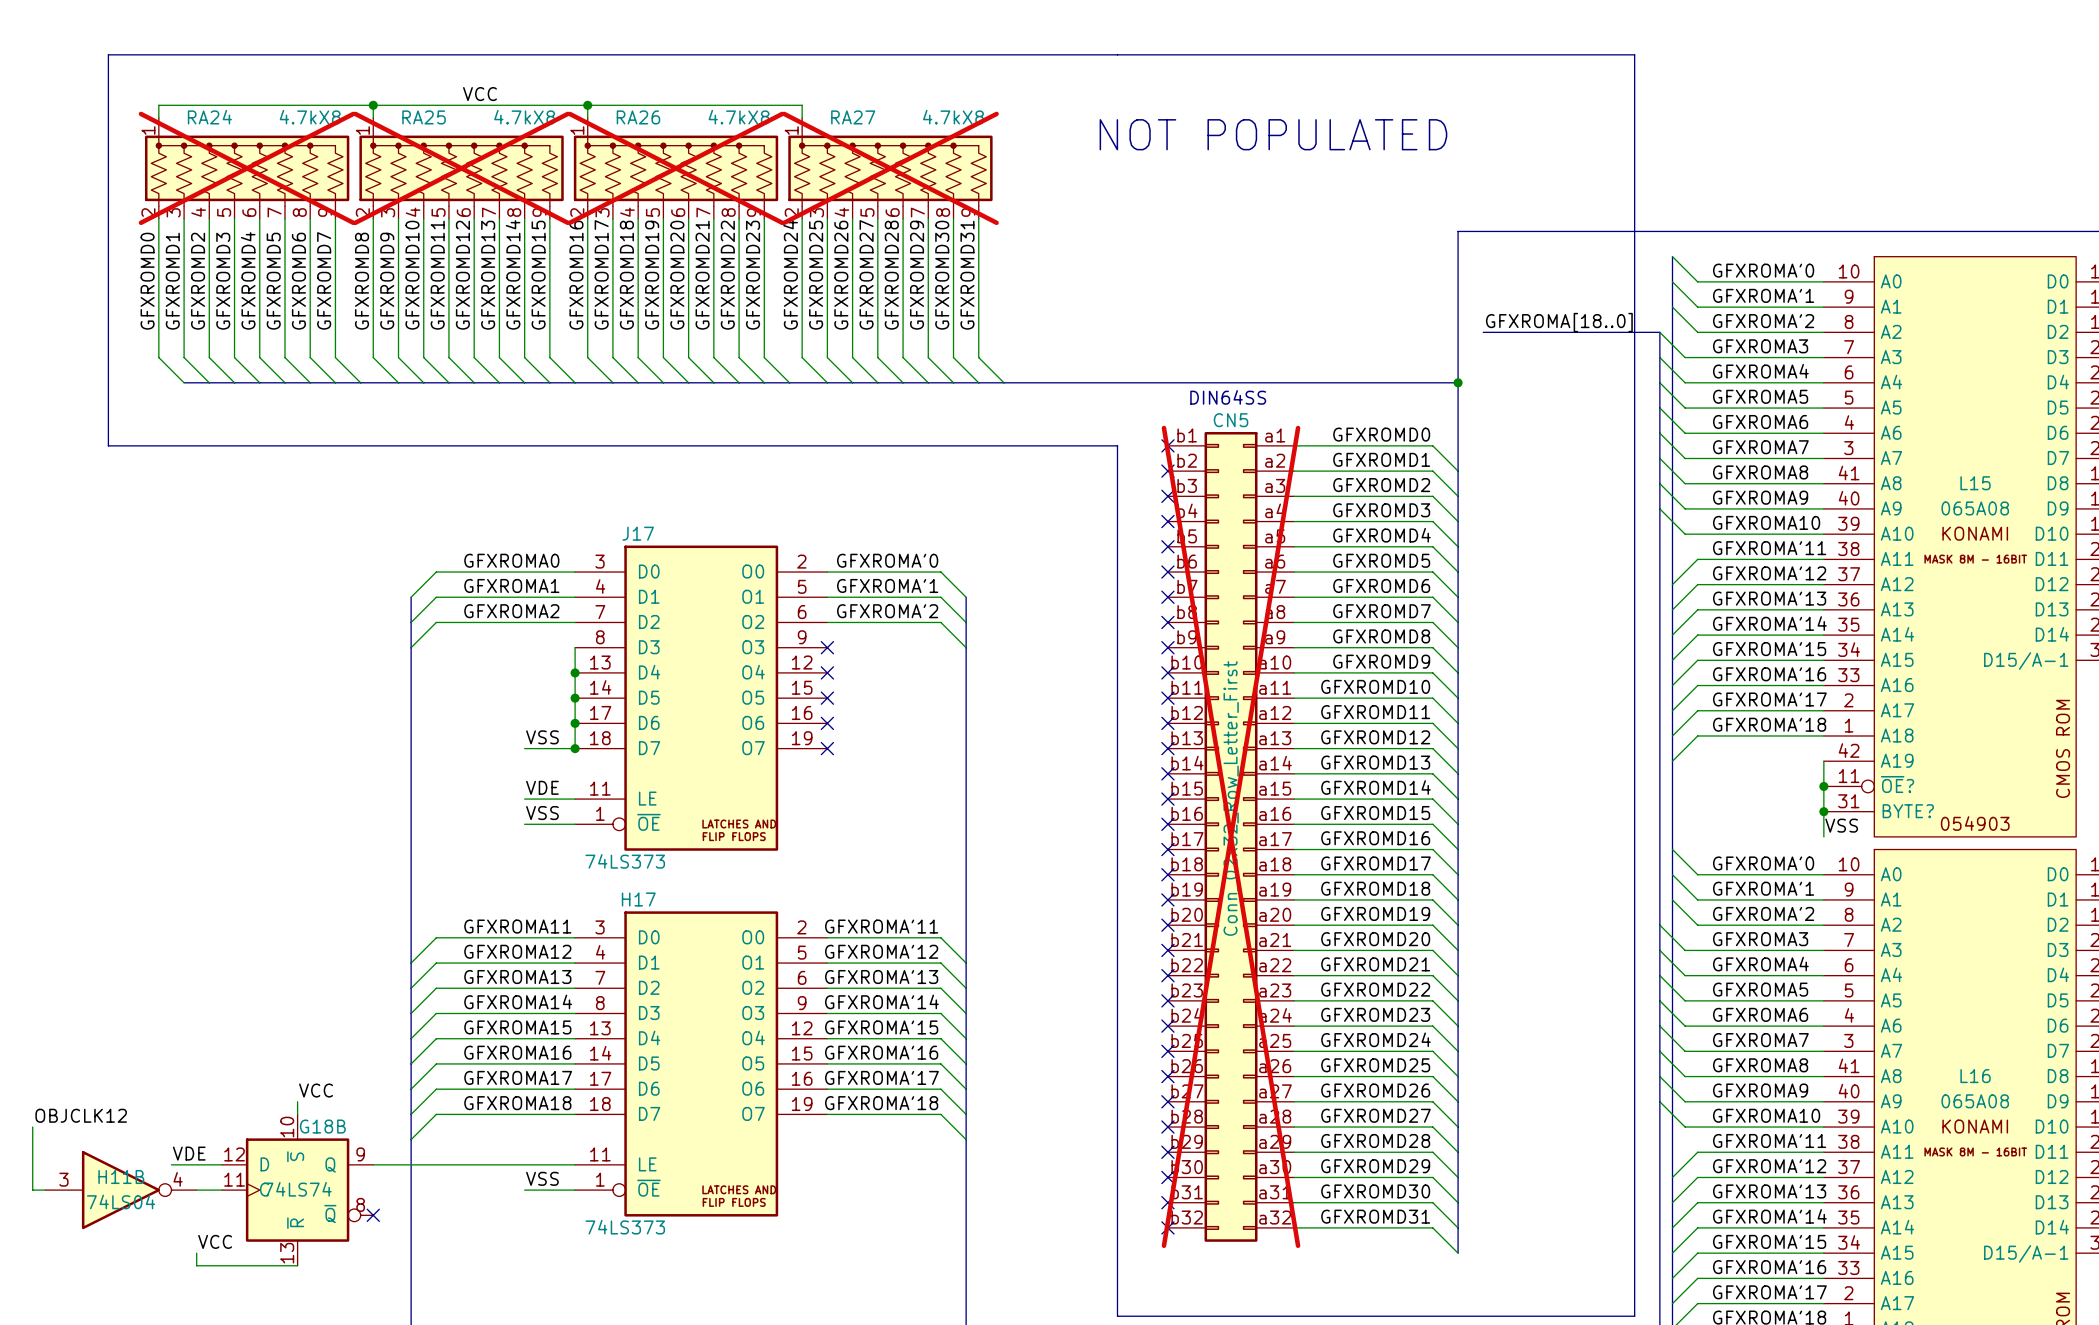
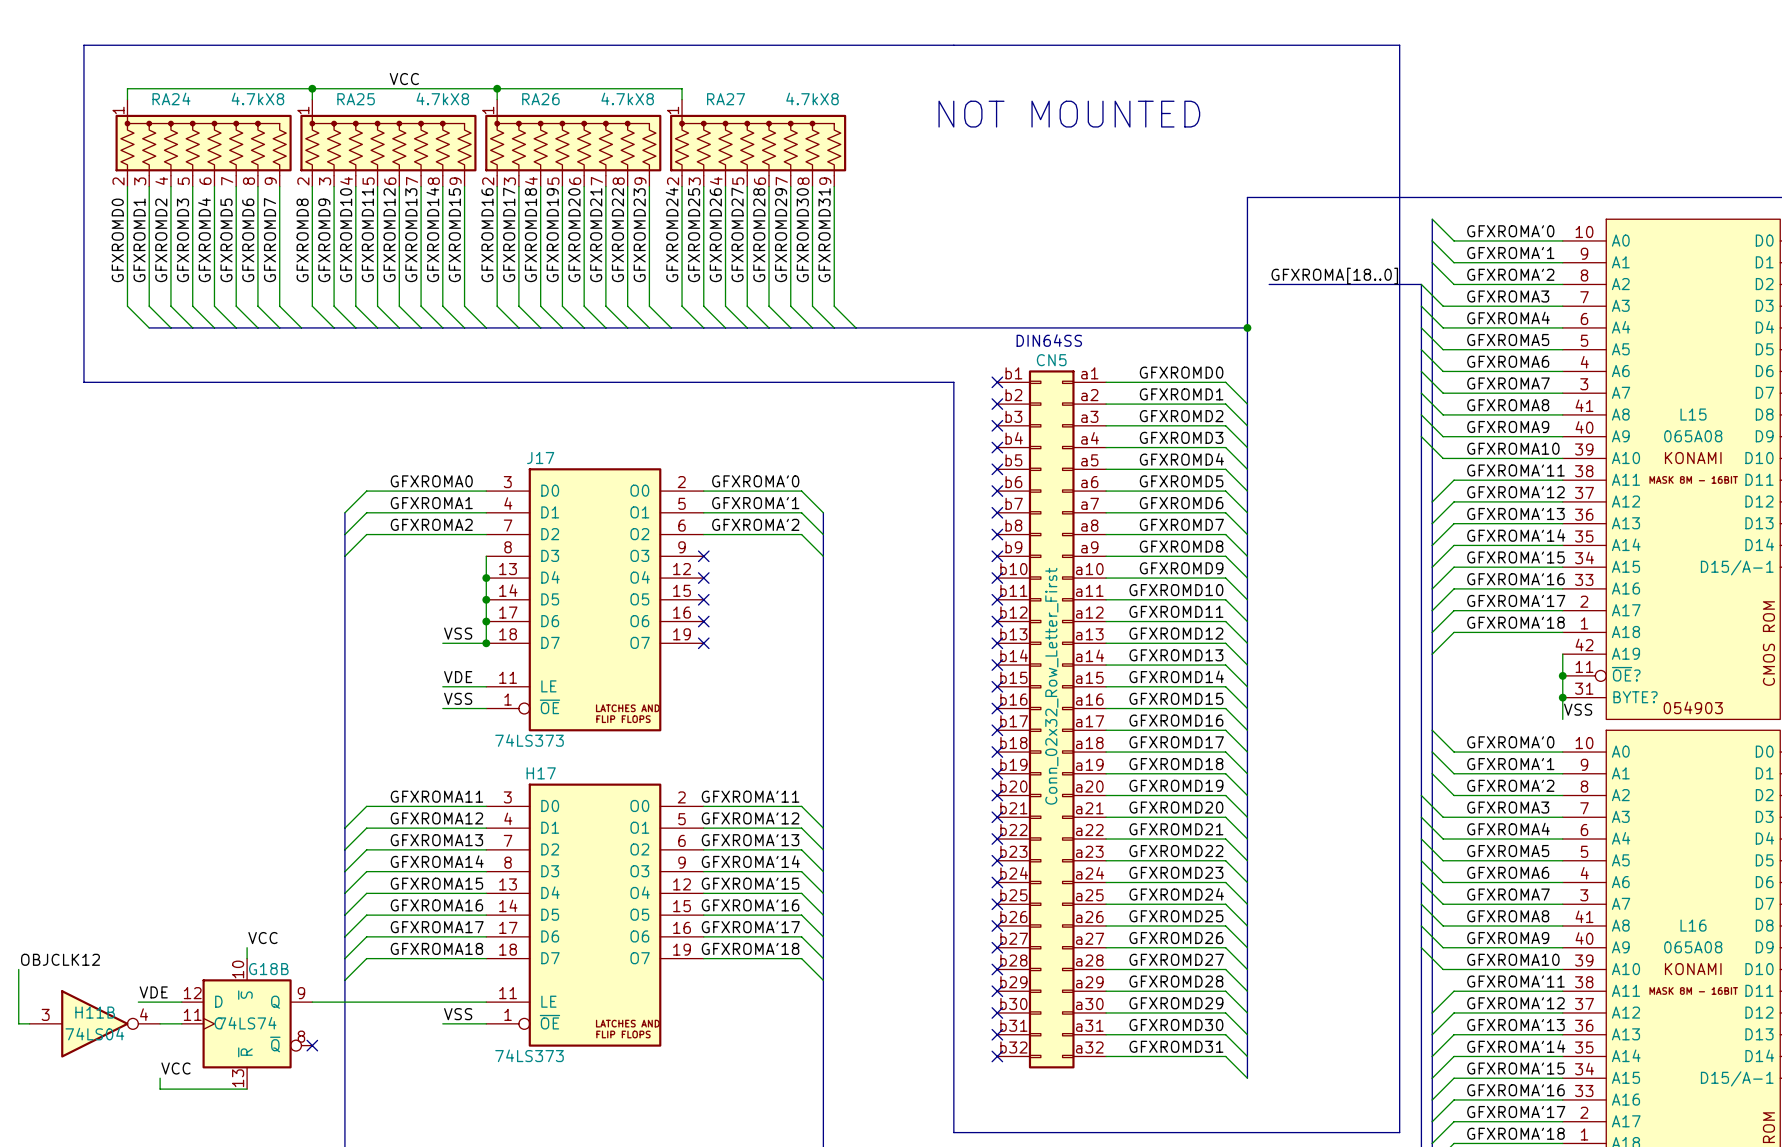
text: NOT POPULATED (1273, 134) -> NOT MOUNTED (1069, 114)
RA24 do-not-place cross: (247, 168) -> none
RA25 do-not-place cross: (461, 168) -> none
RA26 do-not-place cross: (676, 168) -> none
RA27 do-not-place cross: (890, 168) -> none
CN5 do-not-place cross: (1231, 836) -> none

